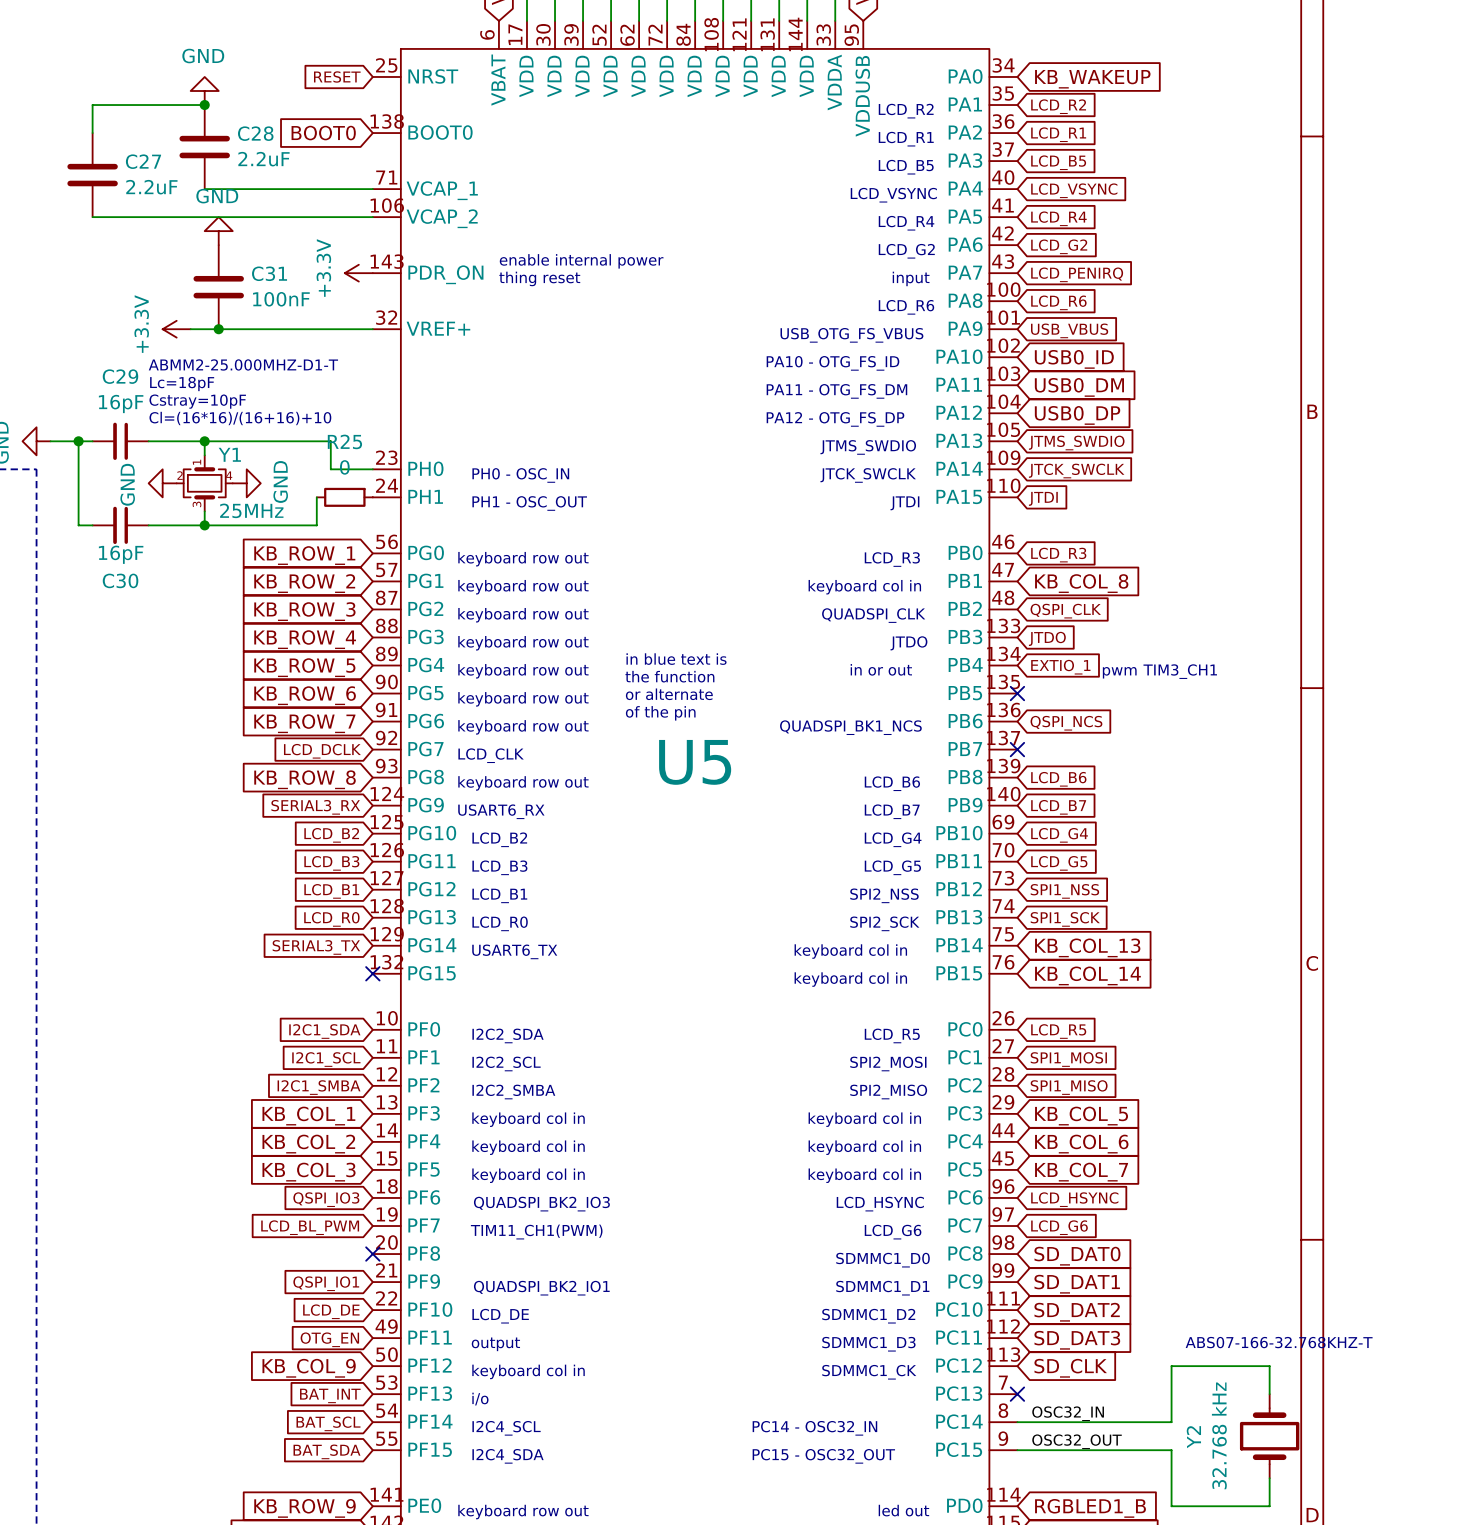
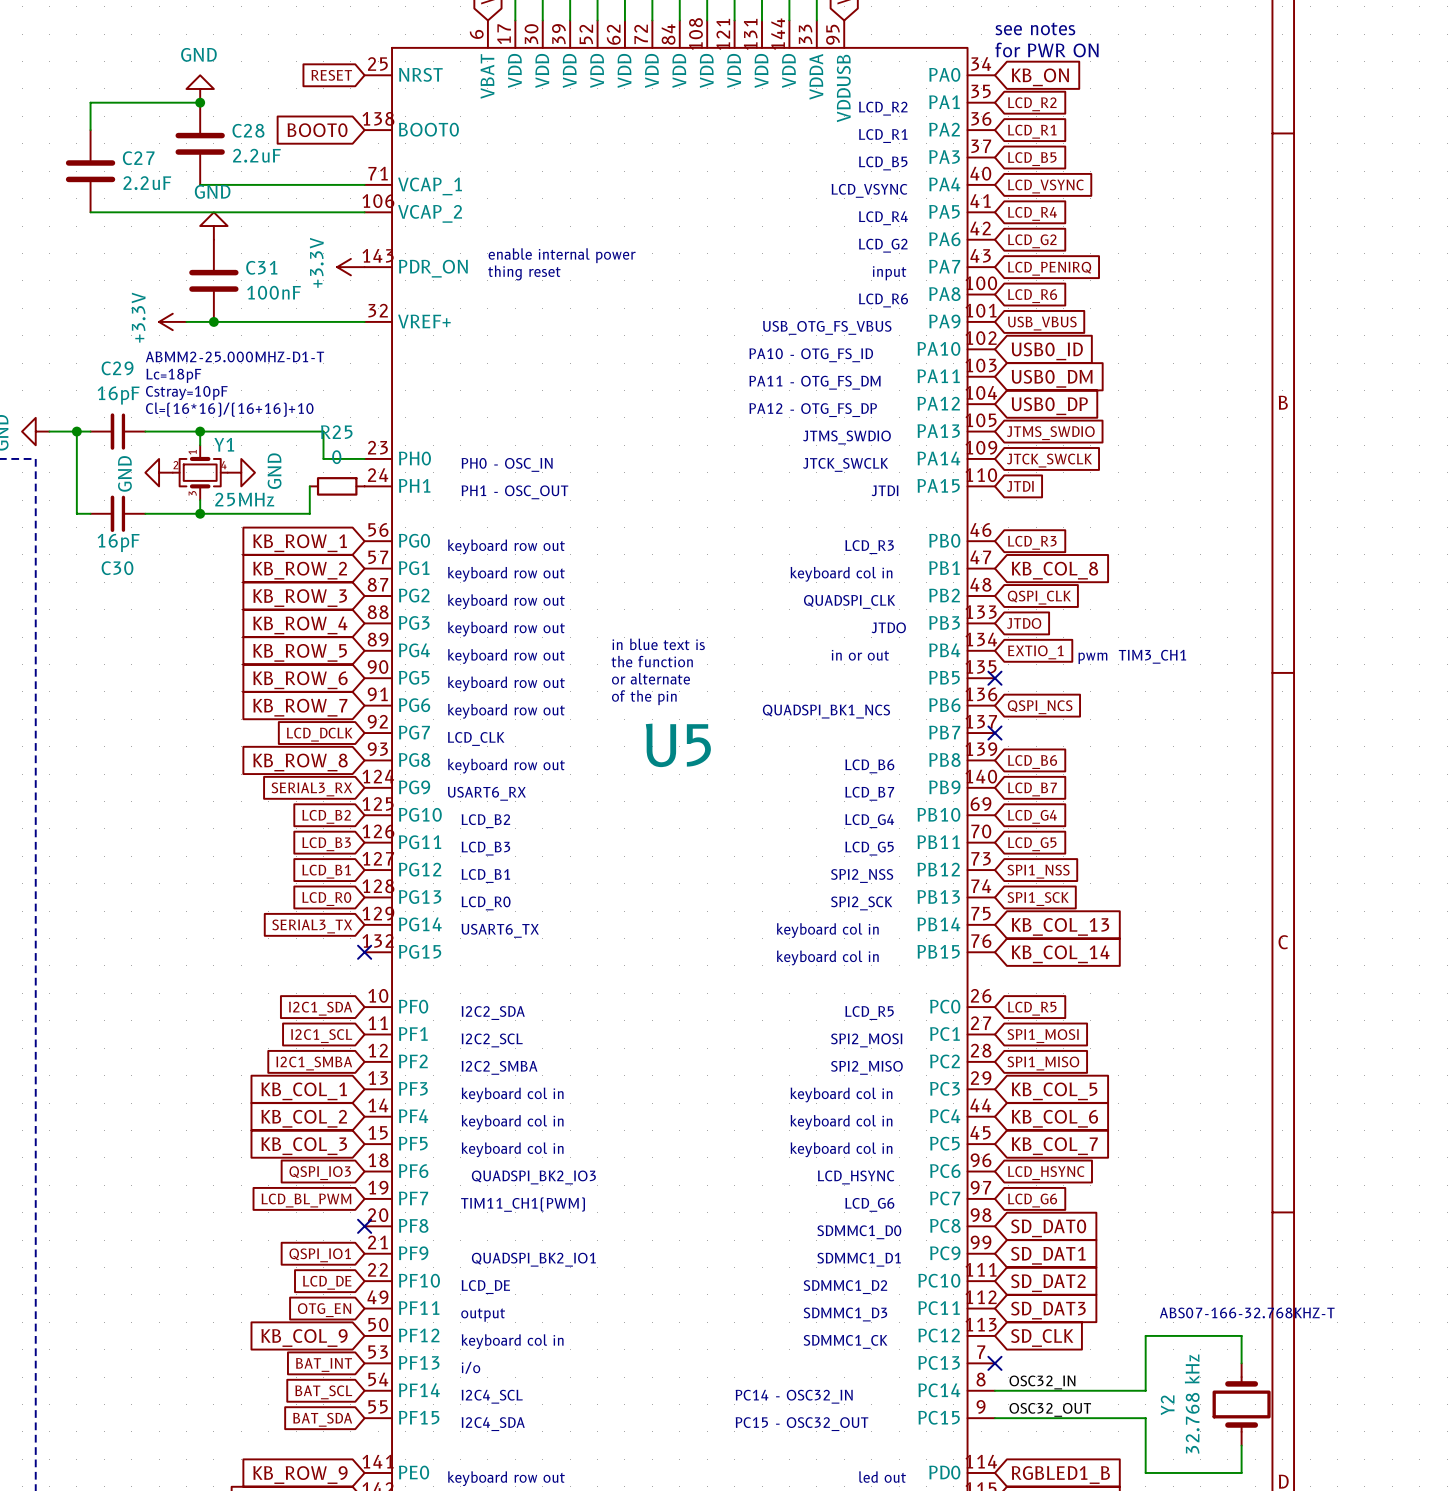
text: none -> see notes (1035, 28)
text: none -> for PWR ON (1046, 50)
global label: KB_WAKEUP (1092, 79) -> KB_ON (1040, 77)

